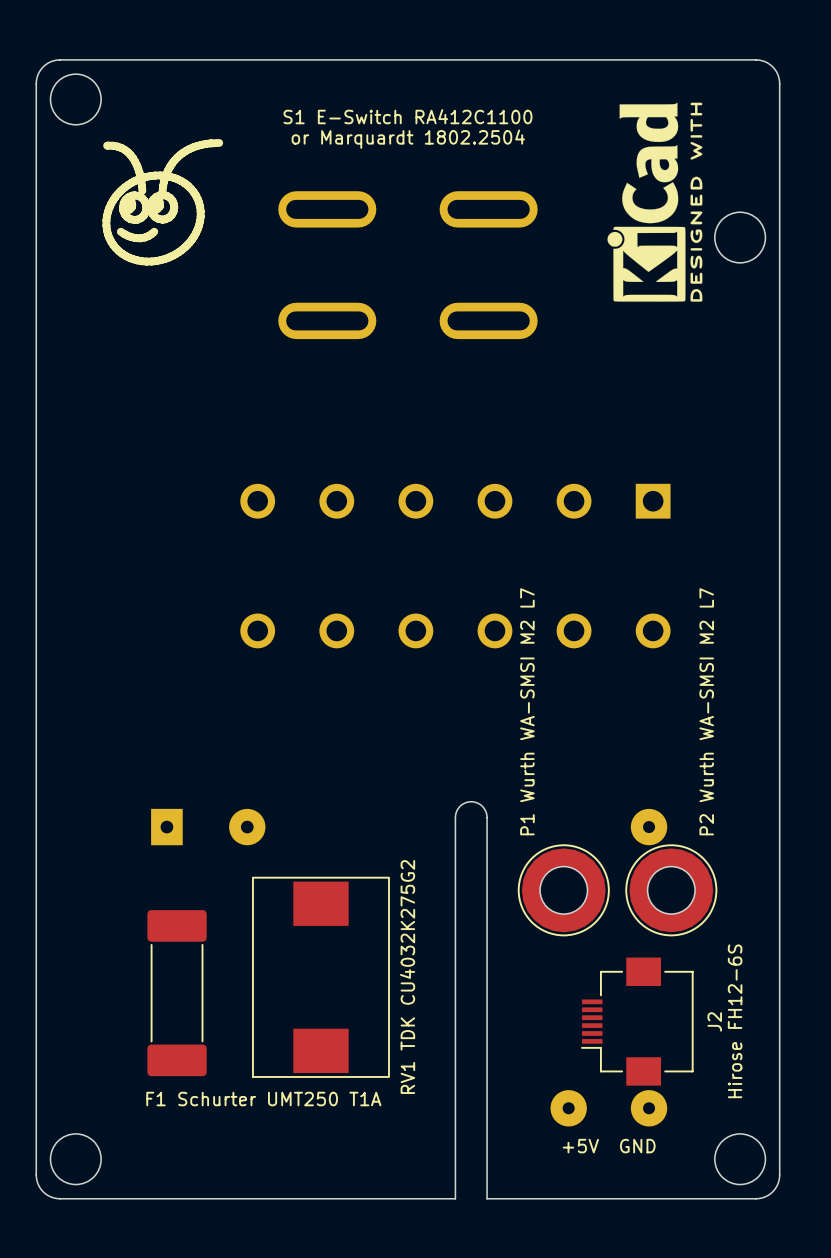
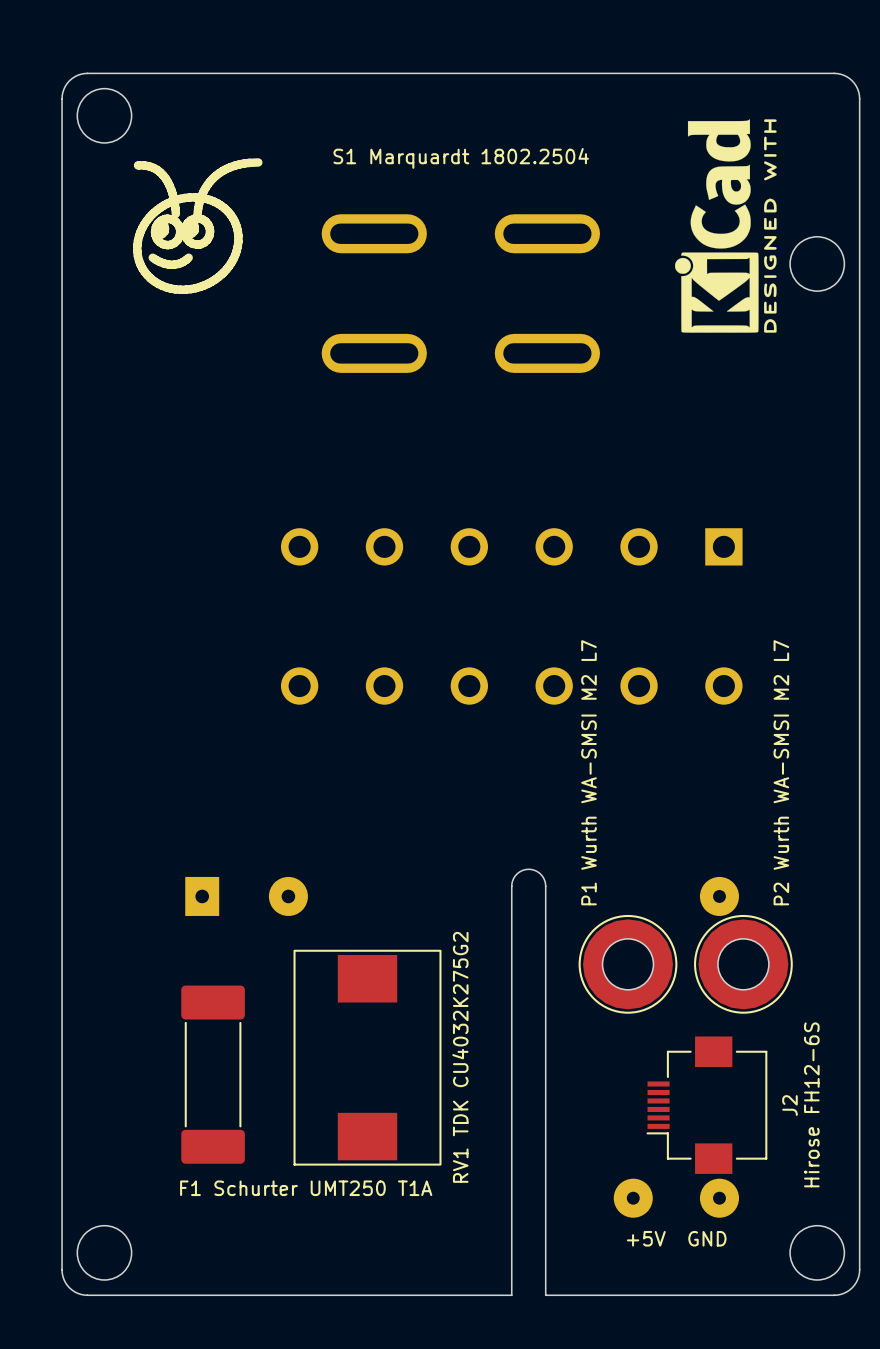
text: S1 E-Switch RA412C1100 (407, 116) -> none
text: or Marquardt 1802.2504 (408, 139) -> S1 Marquardt 1802.2504 (461, 158)

